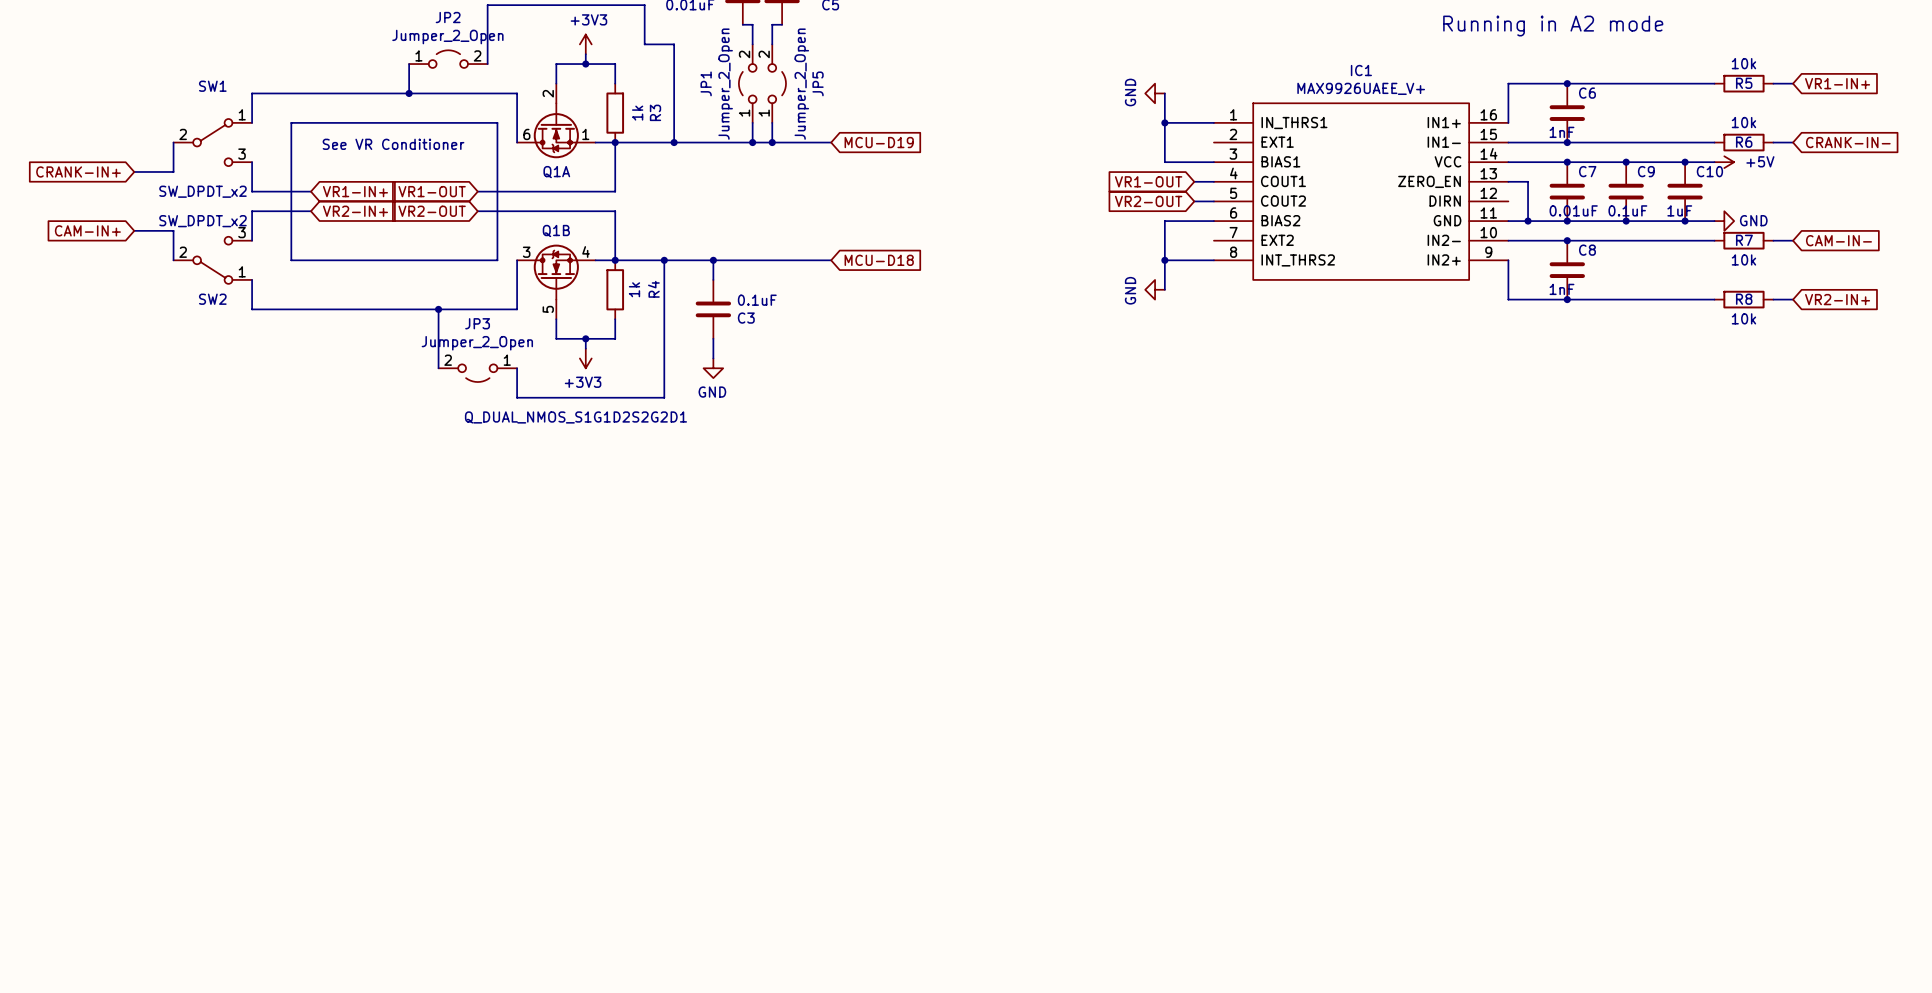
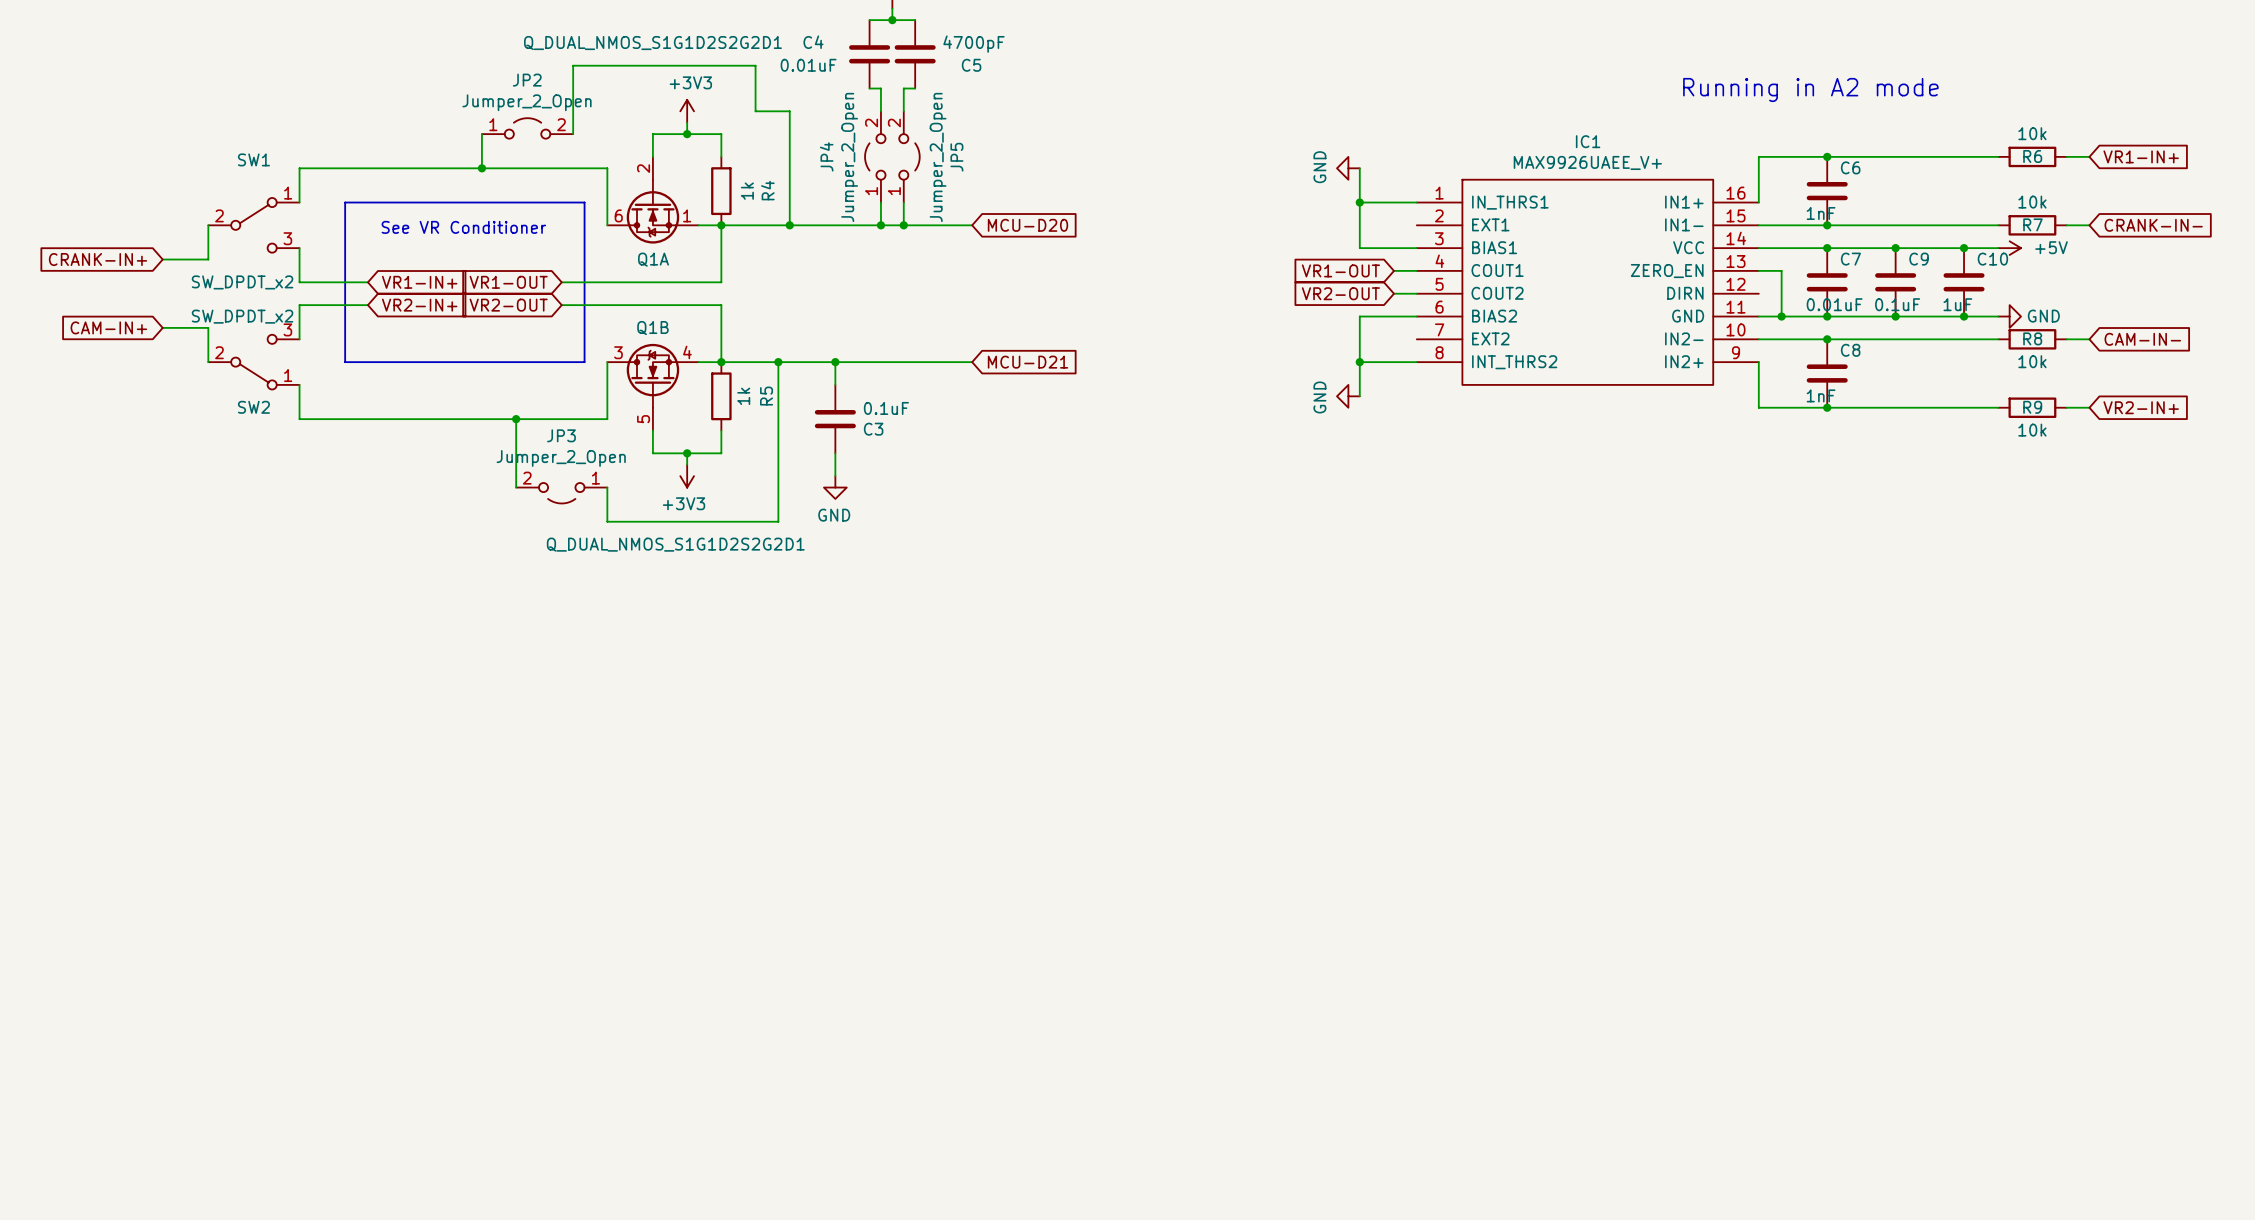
JP1 name: JP1 (706, 83) -> JP4 (826, 156)
R5 name: R5 (1744, 83) -> R6 (2032, 156)
R3 name: R3 (655, 112) -> R4 (767, 190)
global label: MCU-D19 (879, 142) -> MCU-D20 (1027, 225)
R6 name: R6 (1744, 142) -> R7 (2032, 224)
R7 name: R7 (1744, 240) -> R8 (2032, 338)
global label: MCU-D18 (879, 260) -> MCU-D21 (1027, 362)
R4 name: R4 (653, 289) -> R5 (766, 396)
R8 name: R8 (1744, 299) -> R9 (2032, 407)

